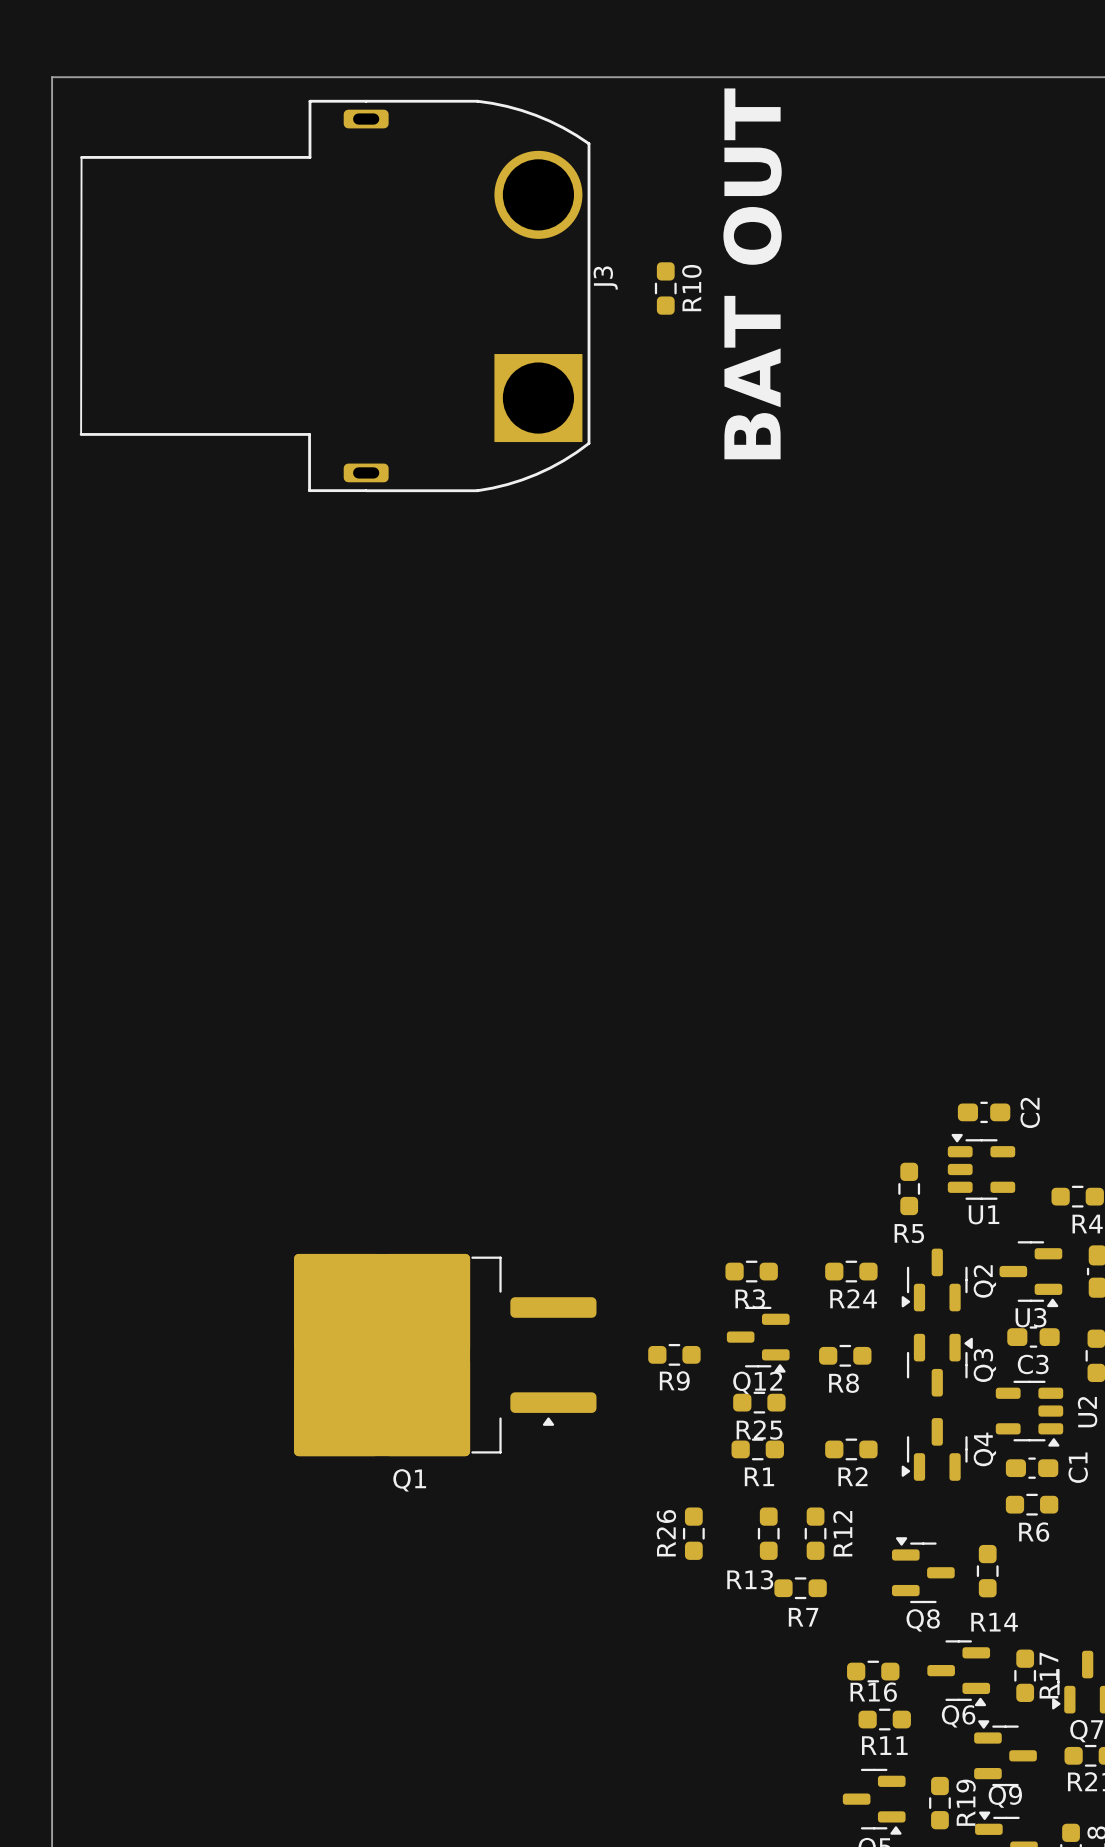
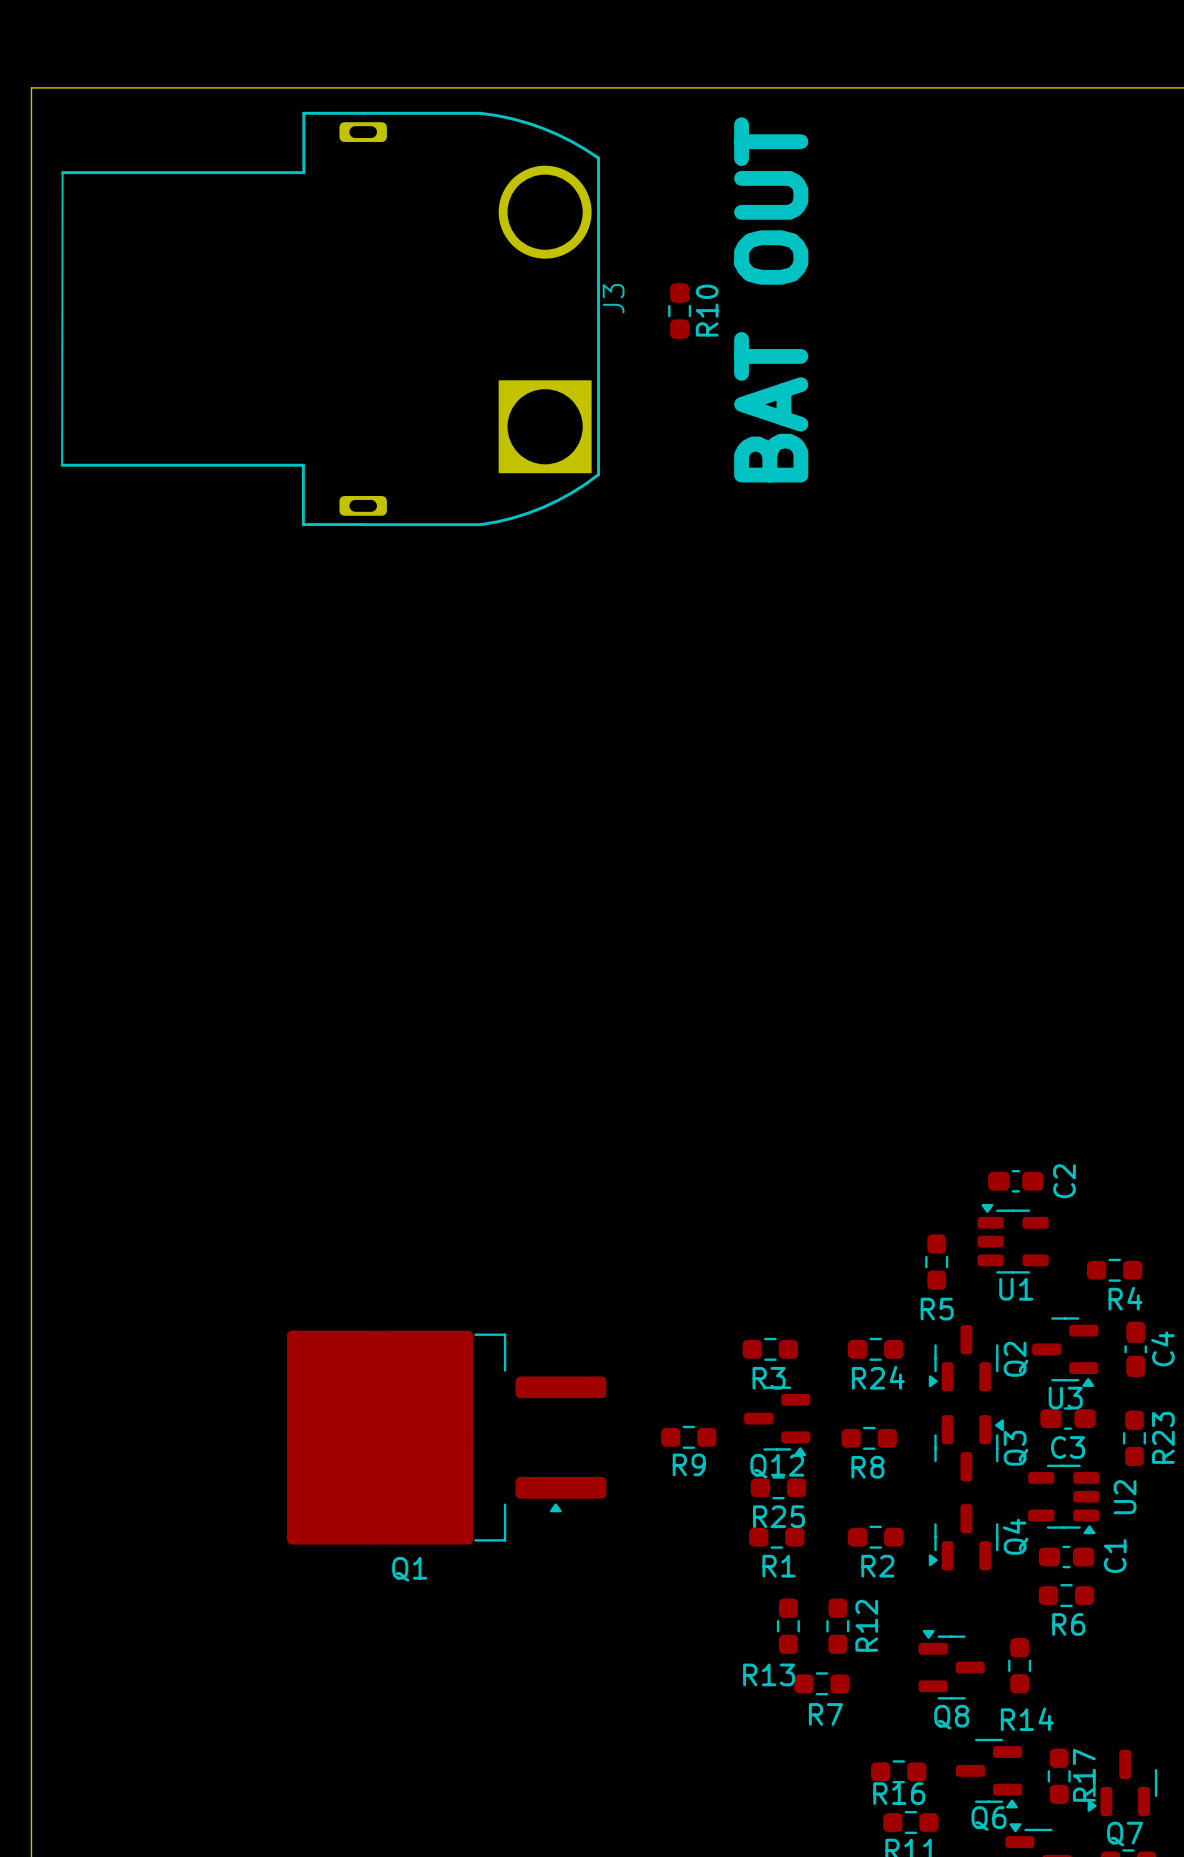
R26: (693, 1533) -> none

